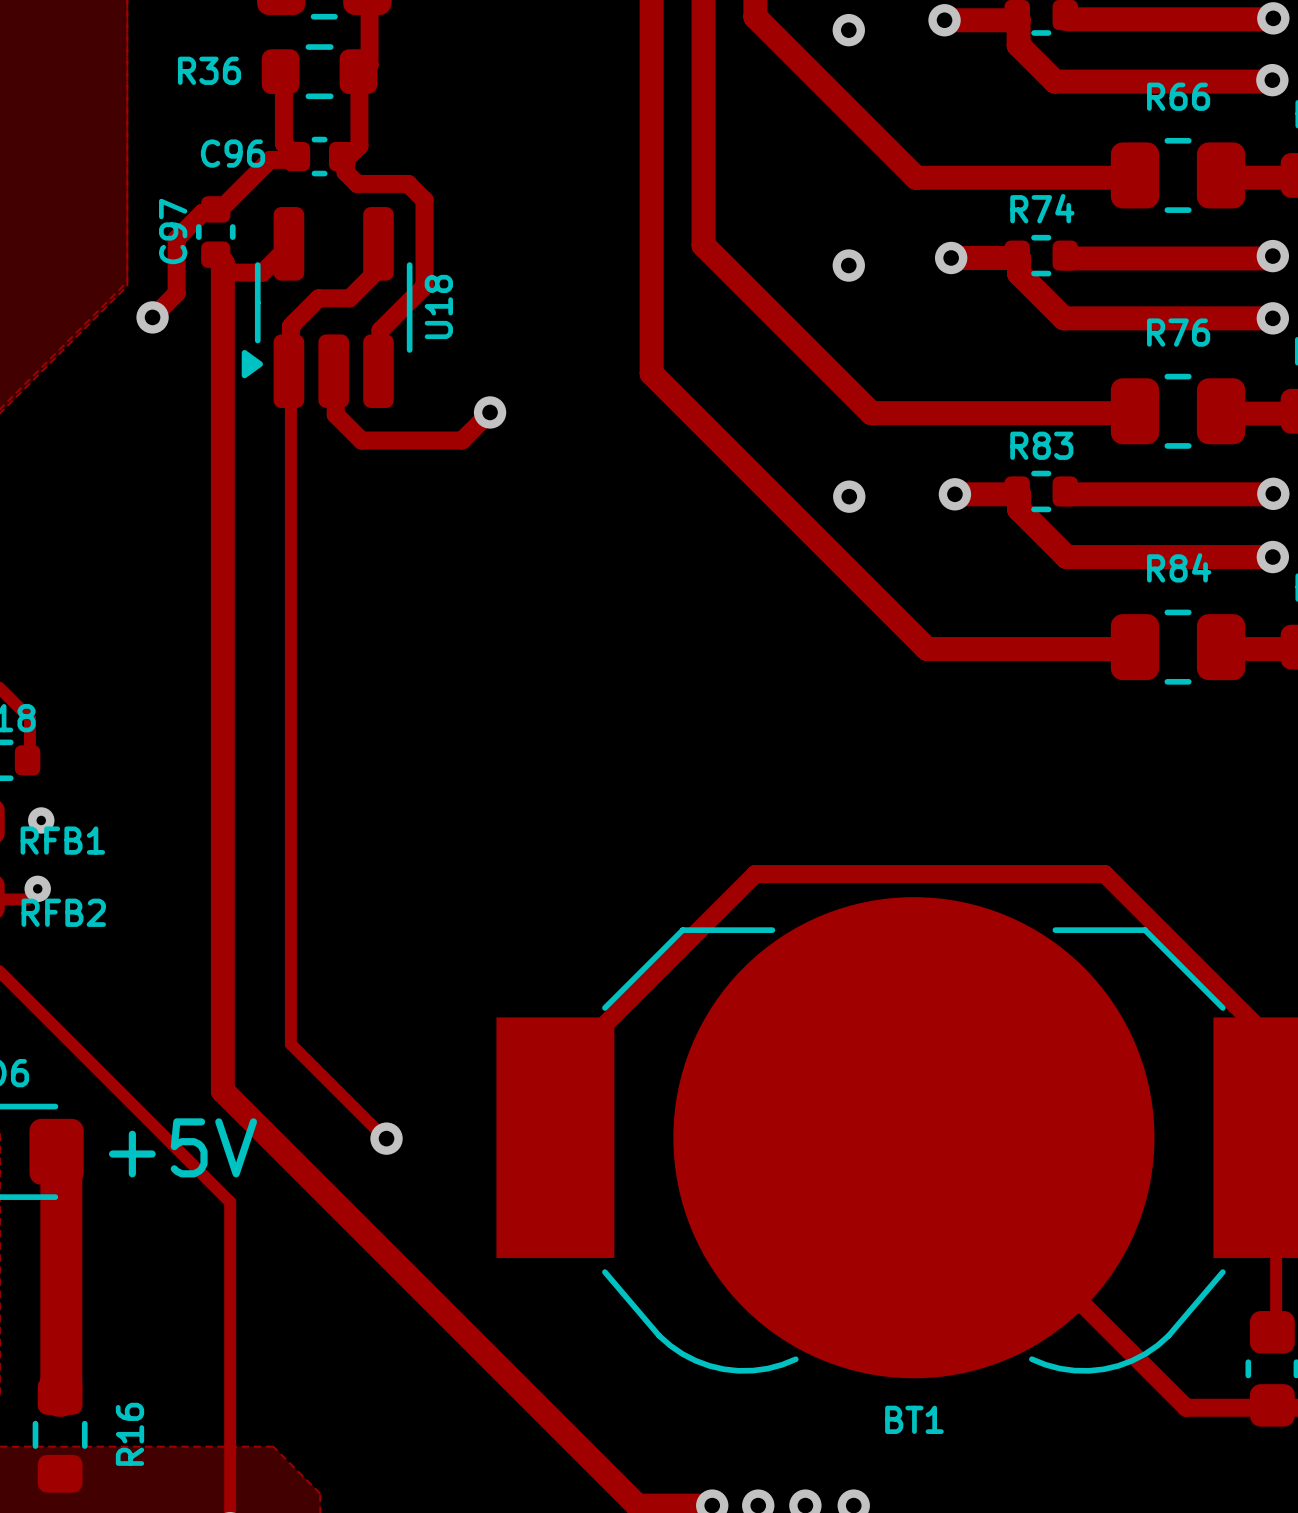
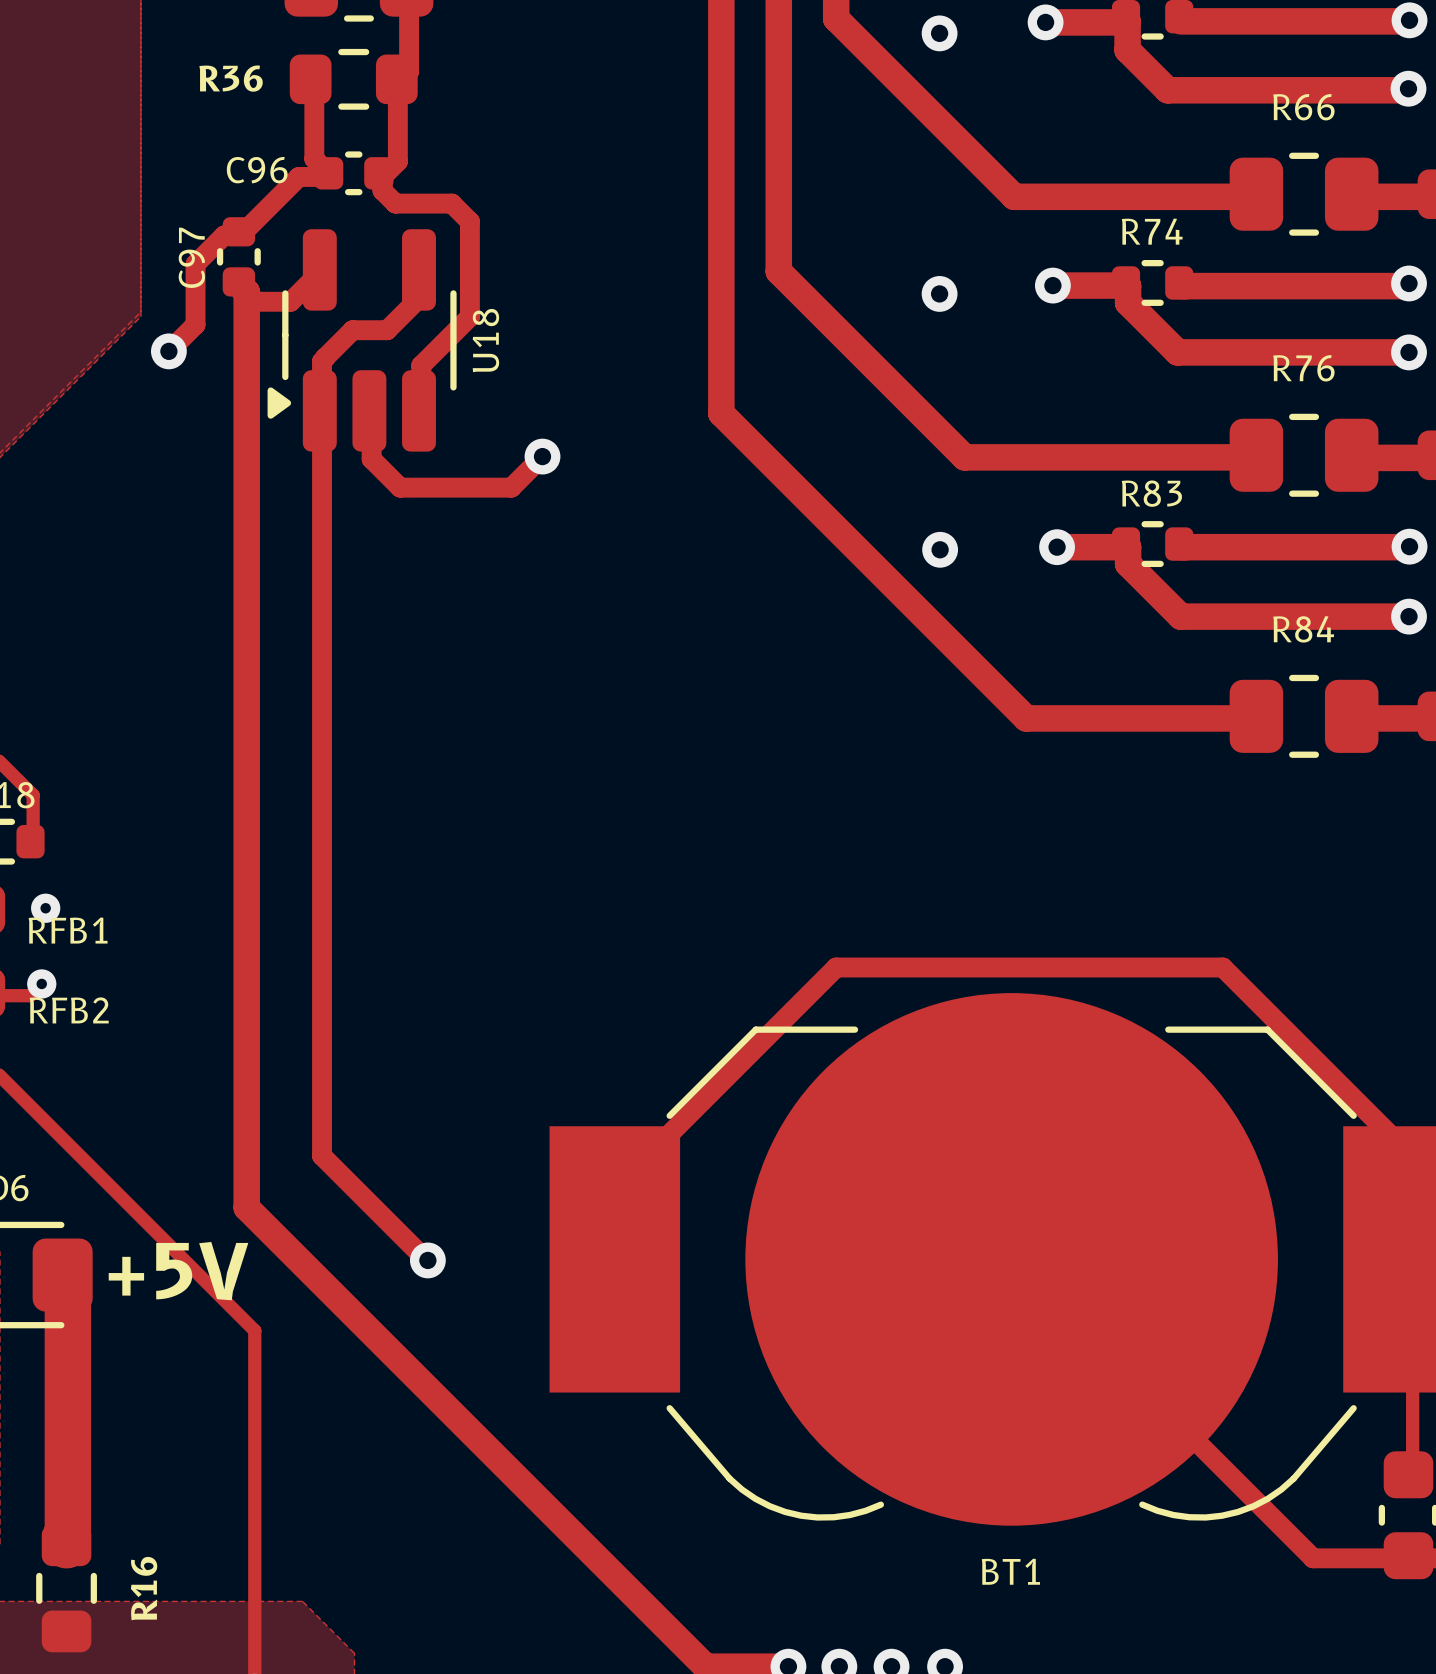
track width: thin (290, 371) (290, 1044) (385, 1138) -> thick (322, 411) (322, 1155) (426, 1260)

